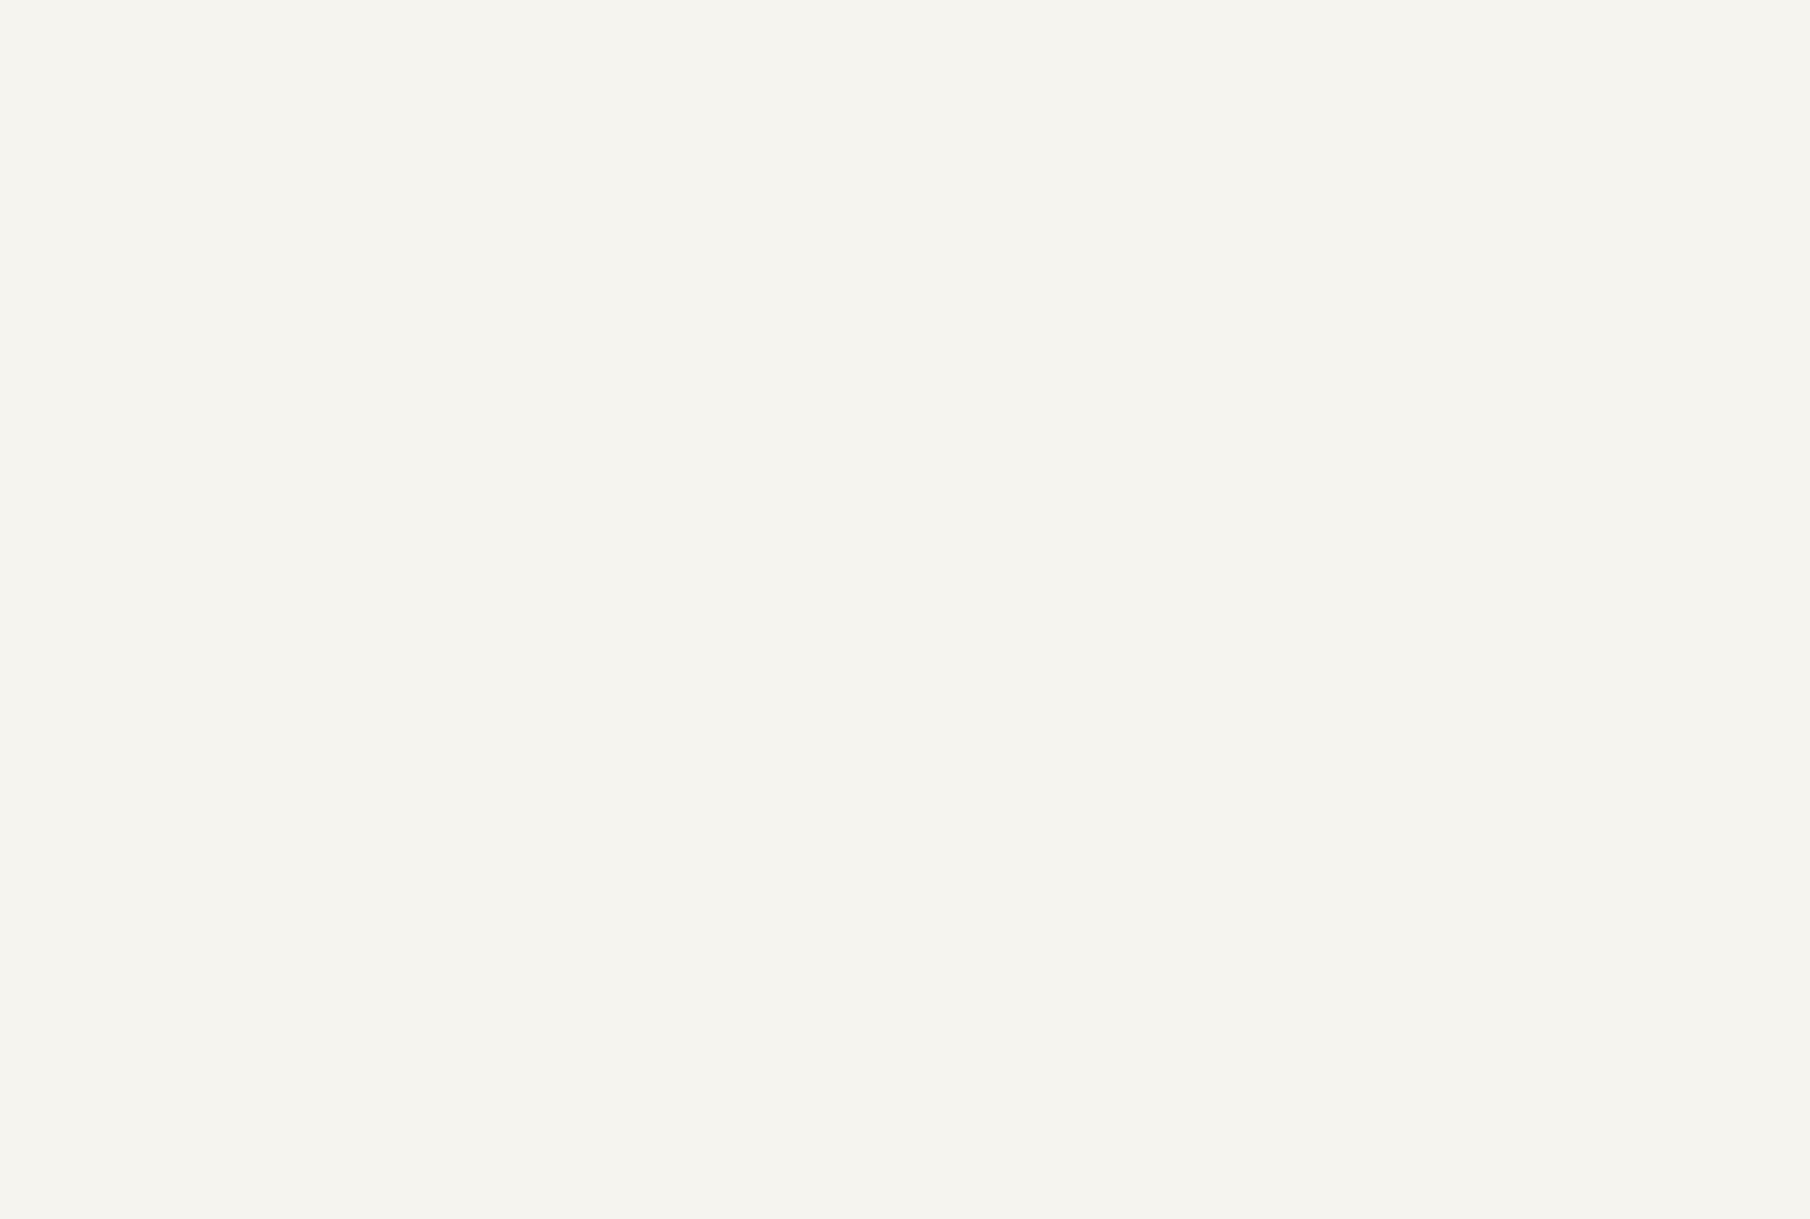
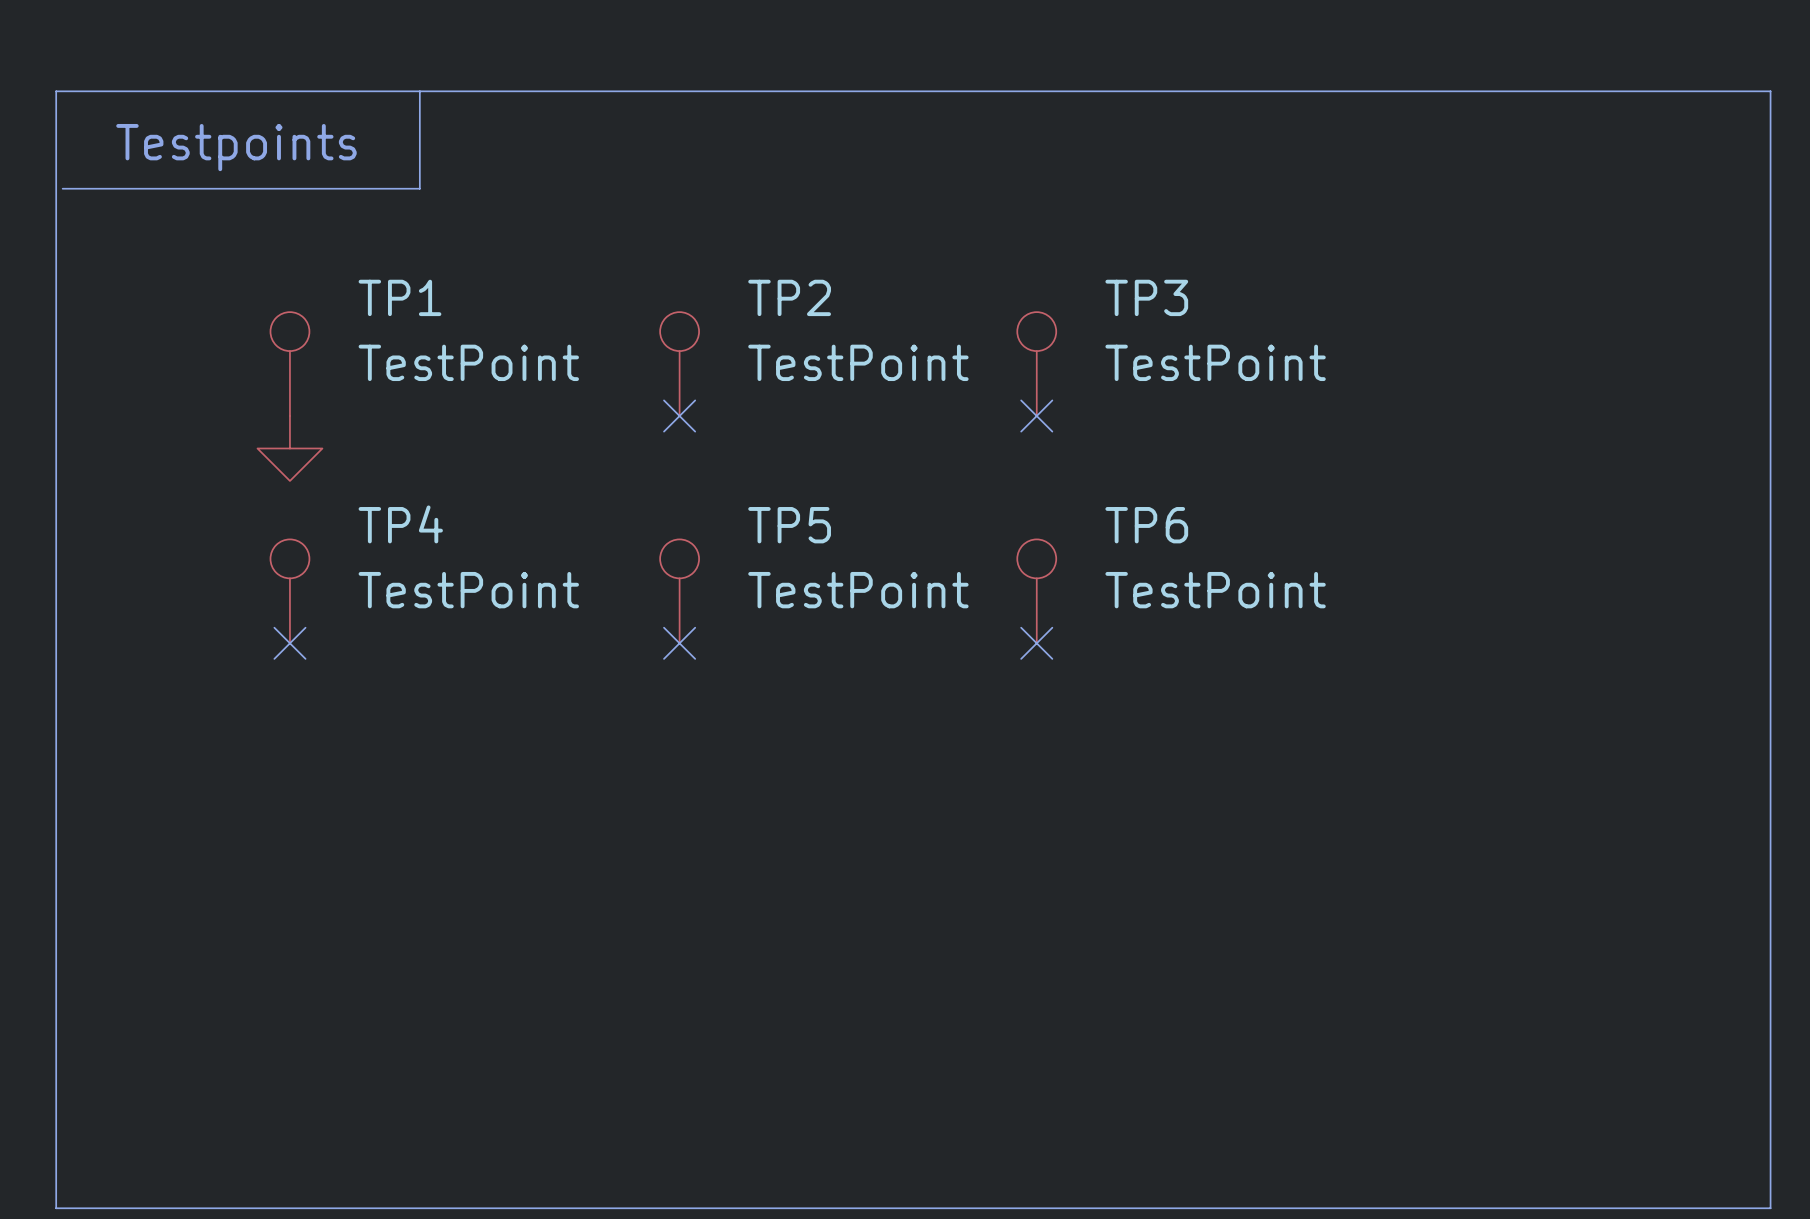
line: none -> (56, 91) (1770, 91) (1770, 1208) (56, 1208) (56, 91)
line: none -> (419, 91) (419, 188) (62, 188)
text: none -> Testpoints (236, 147)
TP1: none -> TestPoint (289, 364)
TP2: none -> TestPoint (679, 364)
TP3: none -> TestPoint (1036, 364)
no-connect mark: none -> (679, 416)
no-connect mark: none -> (1036, 416)
power symbol: none -> (289, 448)
TP4: none -> TestPoint (289, 591)
TP5: none -> TestPoint (679, 591)
TP6: none -> TestPoint (1036, 591)
no-connect mark: none -> (289, 643)
no-connect mark: none -> (679, 643)
no-connect mark: none -> (1036, 643)

